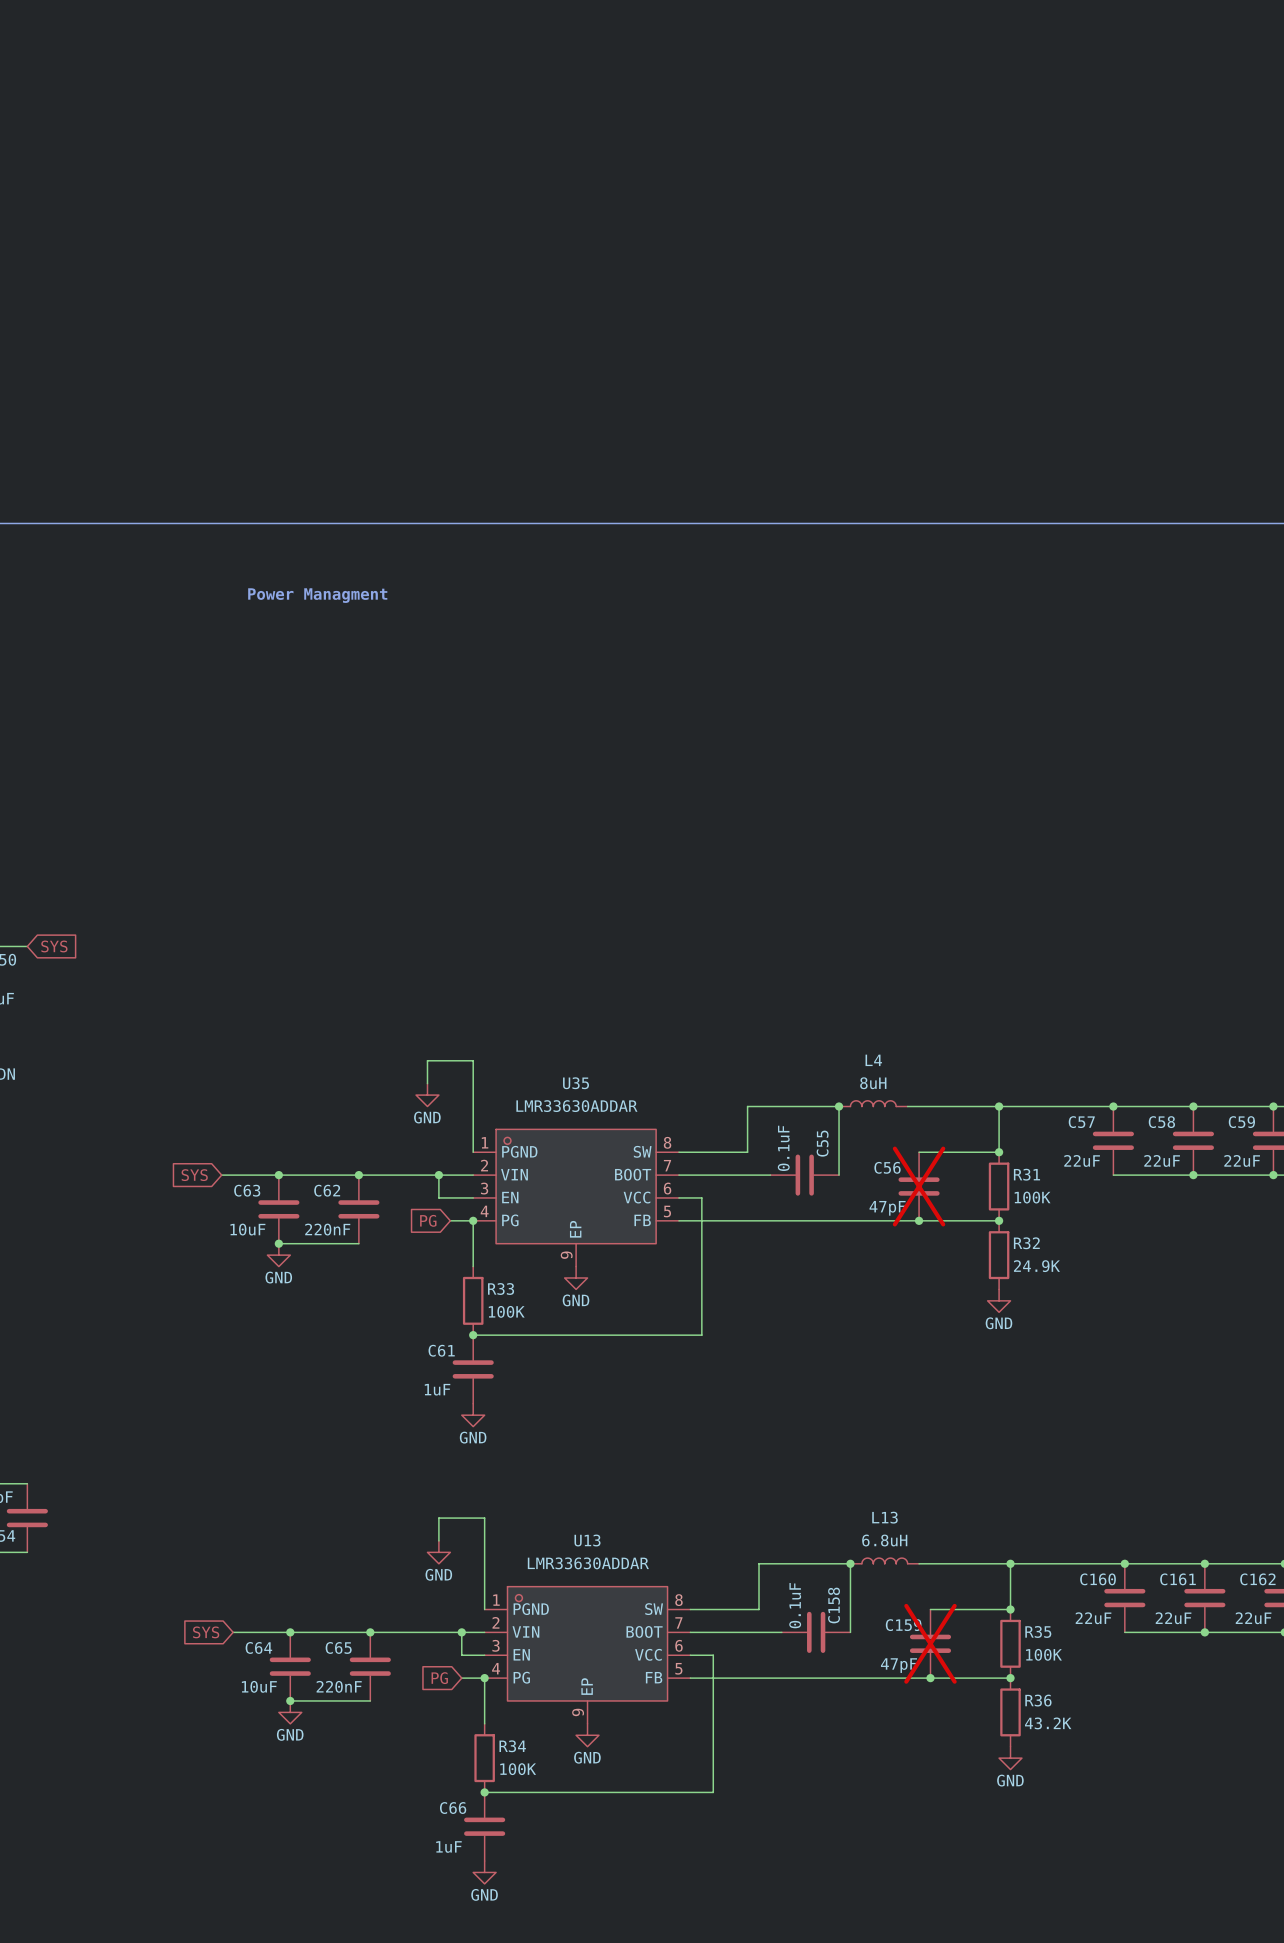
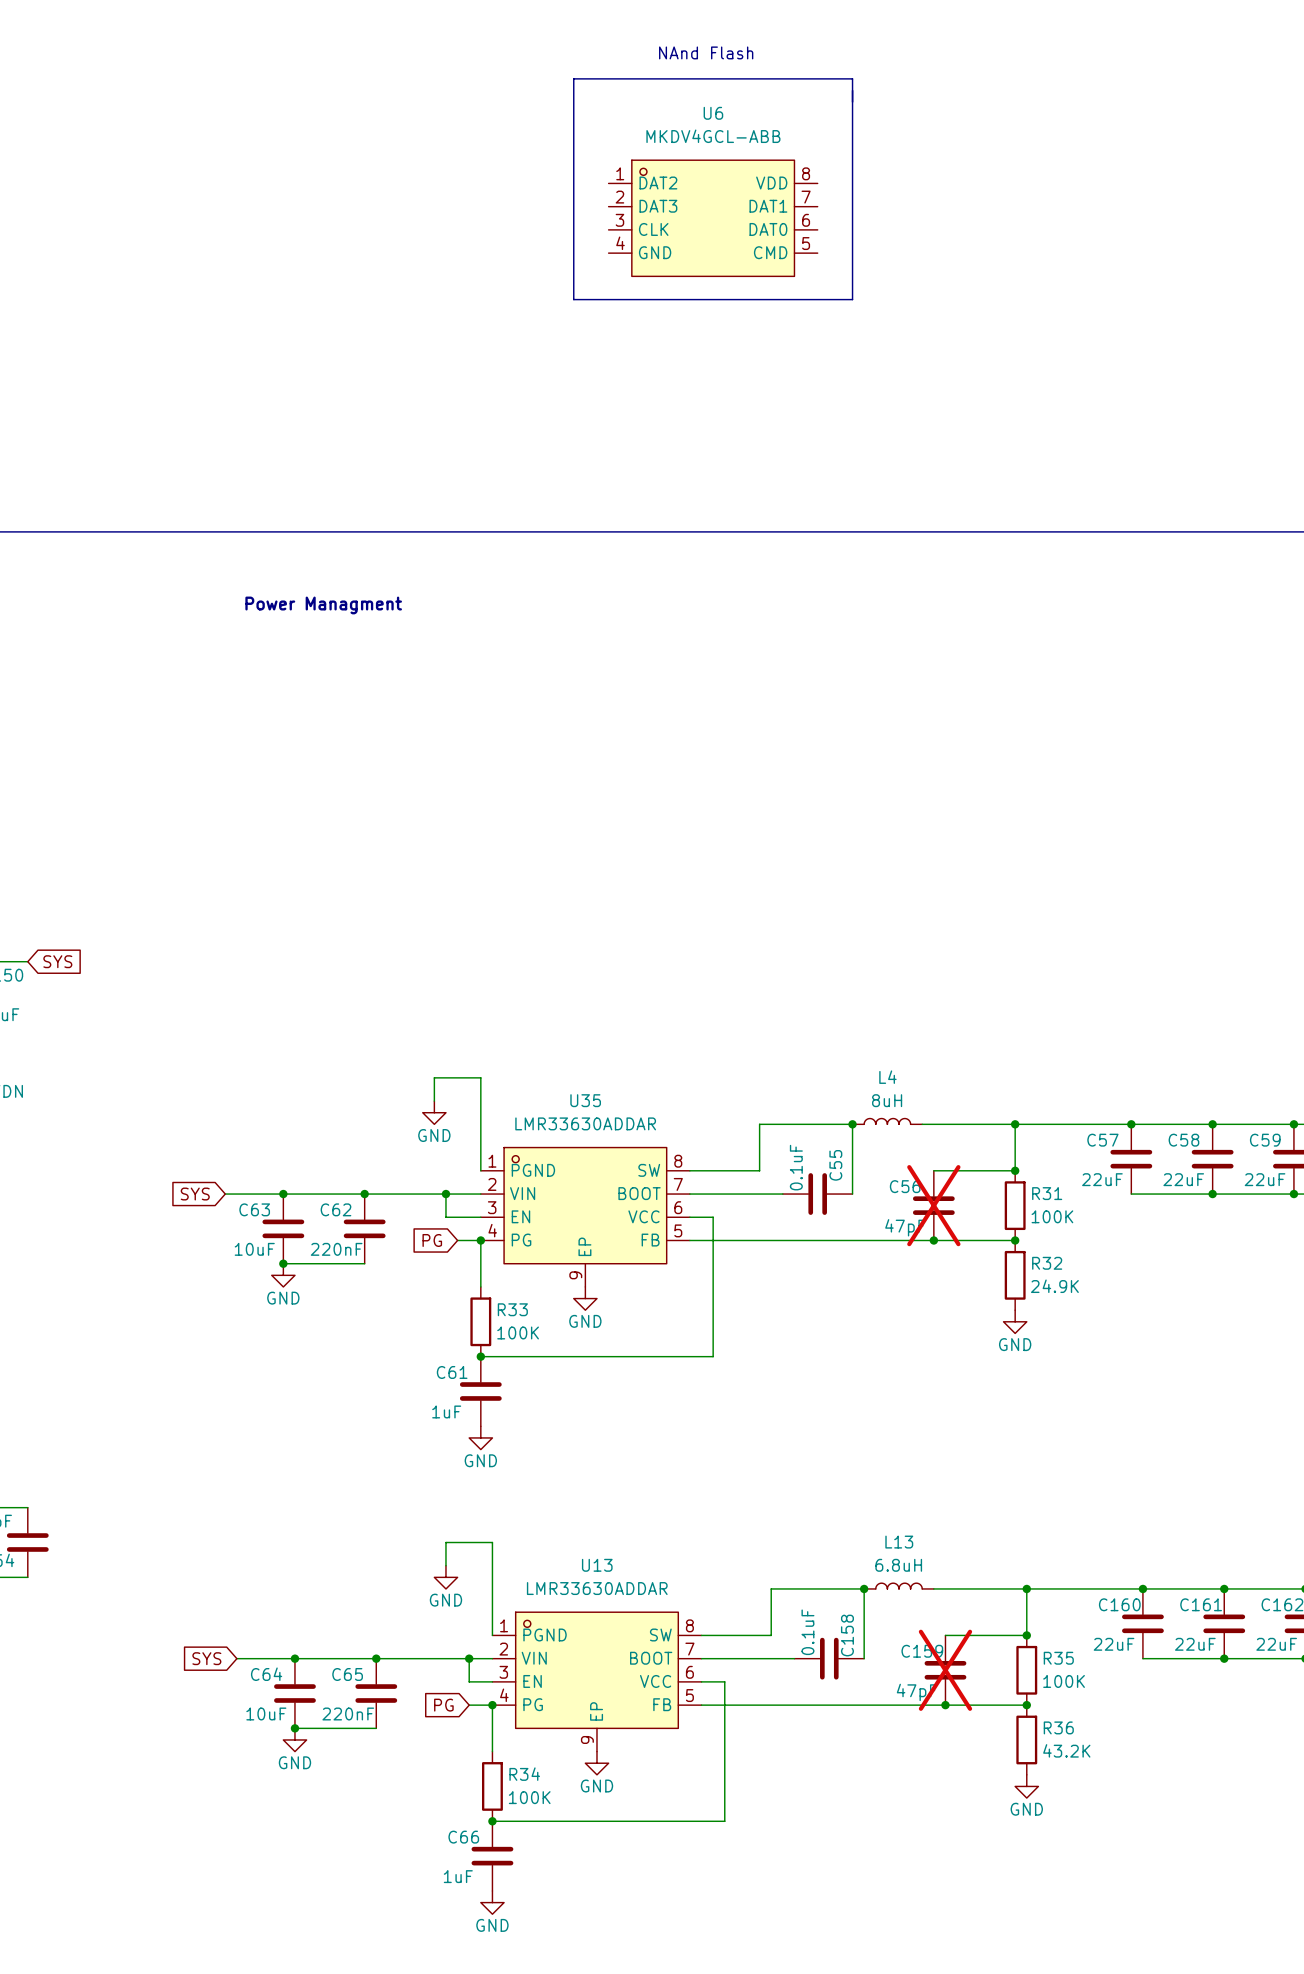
text: none -> NAnd Flash (706, 52)
line: none -> (573, 78) (573, 299) (852, 299) (852, 78) (573, 78)
U6: none -> MKDV4GCL-ABB (713, 218)

